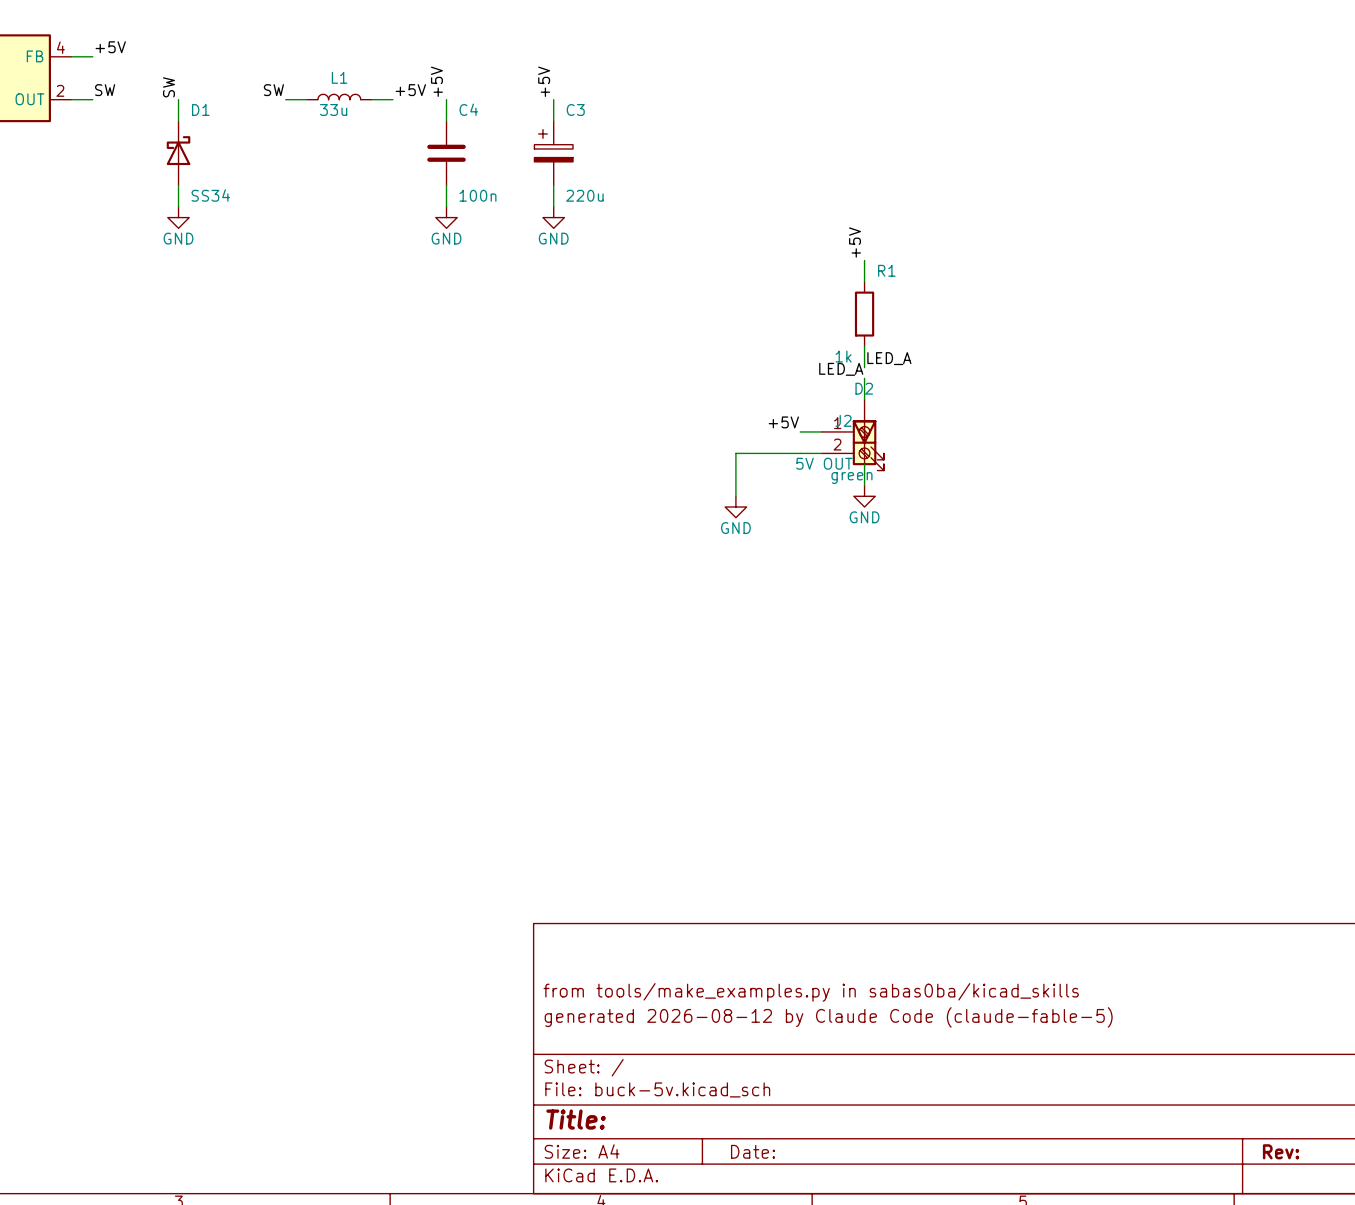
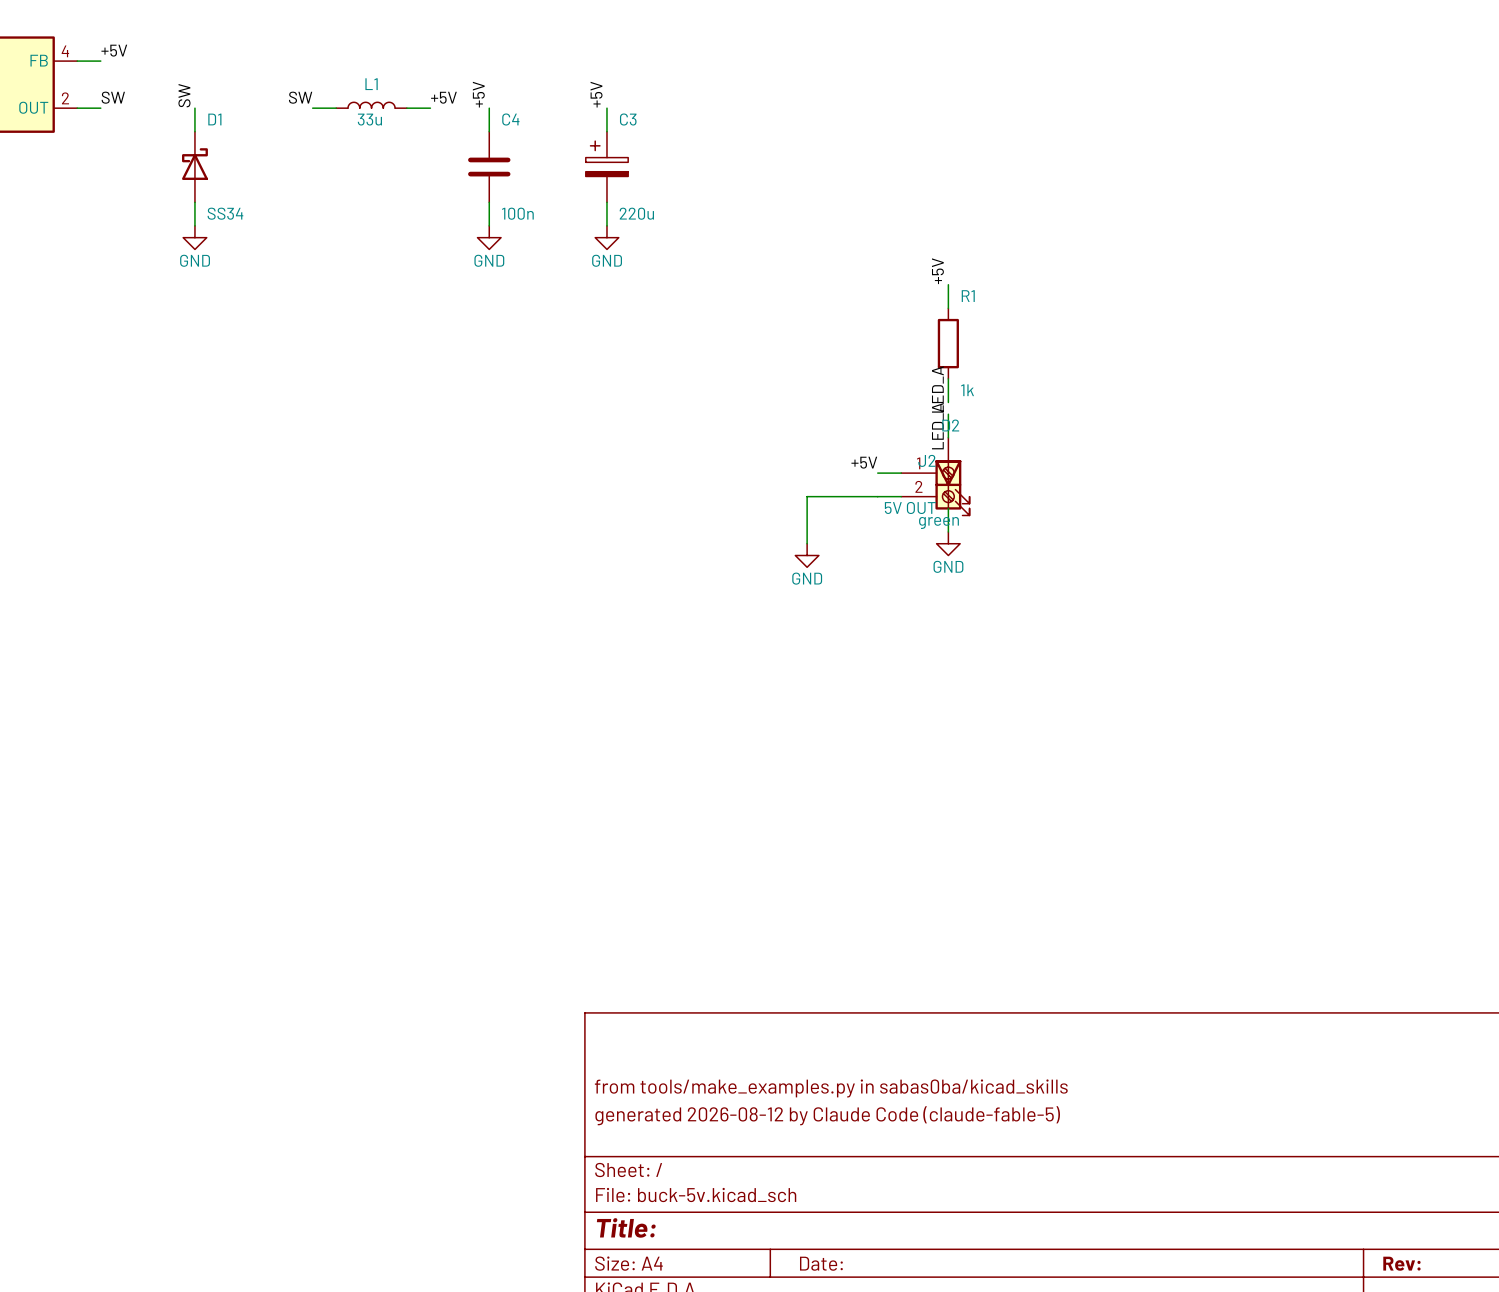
label: none -> LED_A (937, 389)
R1 value position: 1k (843, 356) -> 1k (967, 390)
label: LED_A (889, 358) -> none
label: LED_A (841, 369) -> none
label: none -> LED_A (937, 426)

